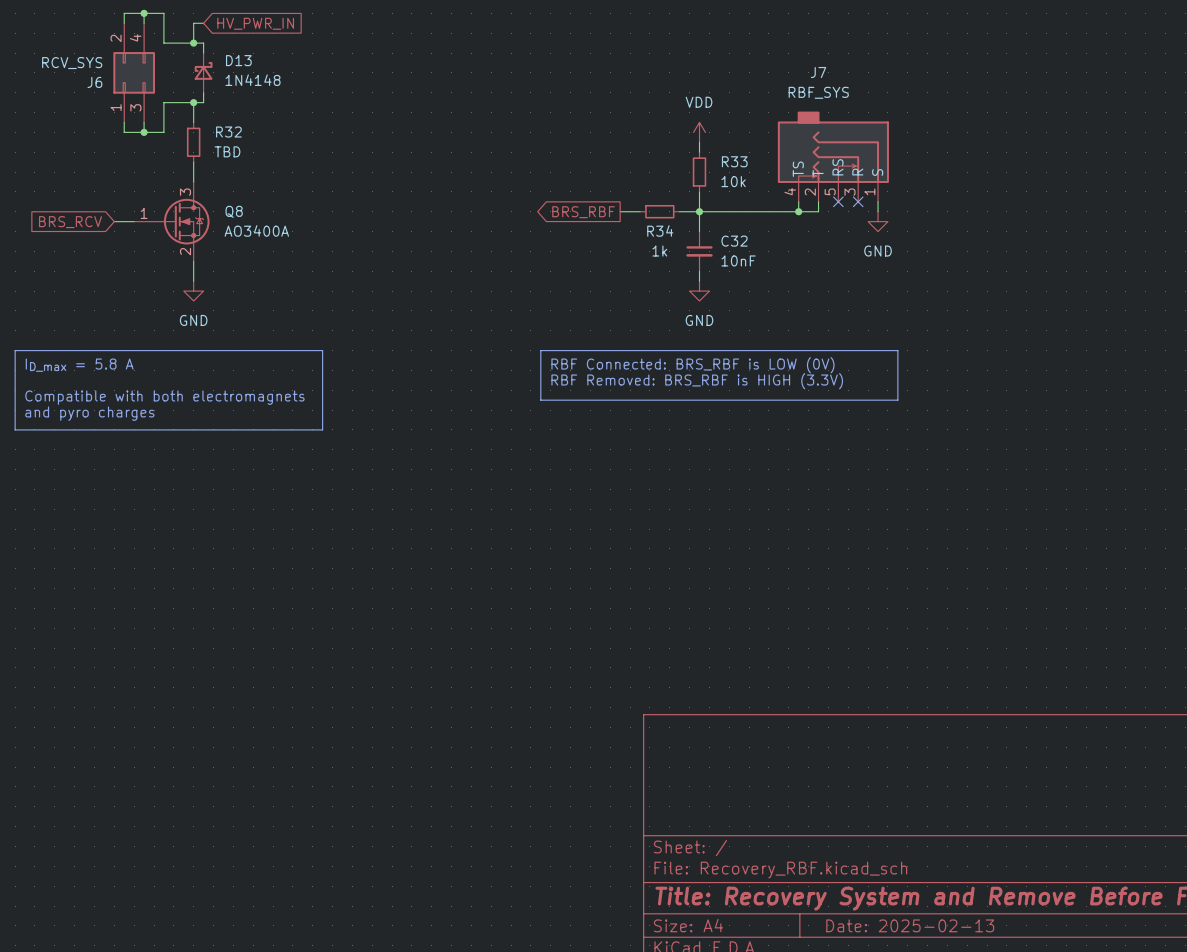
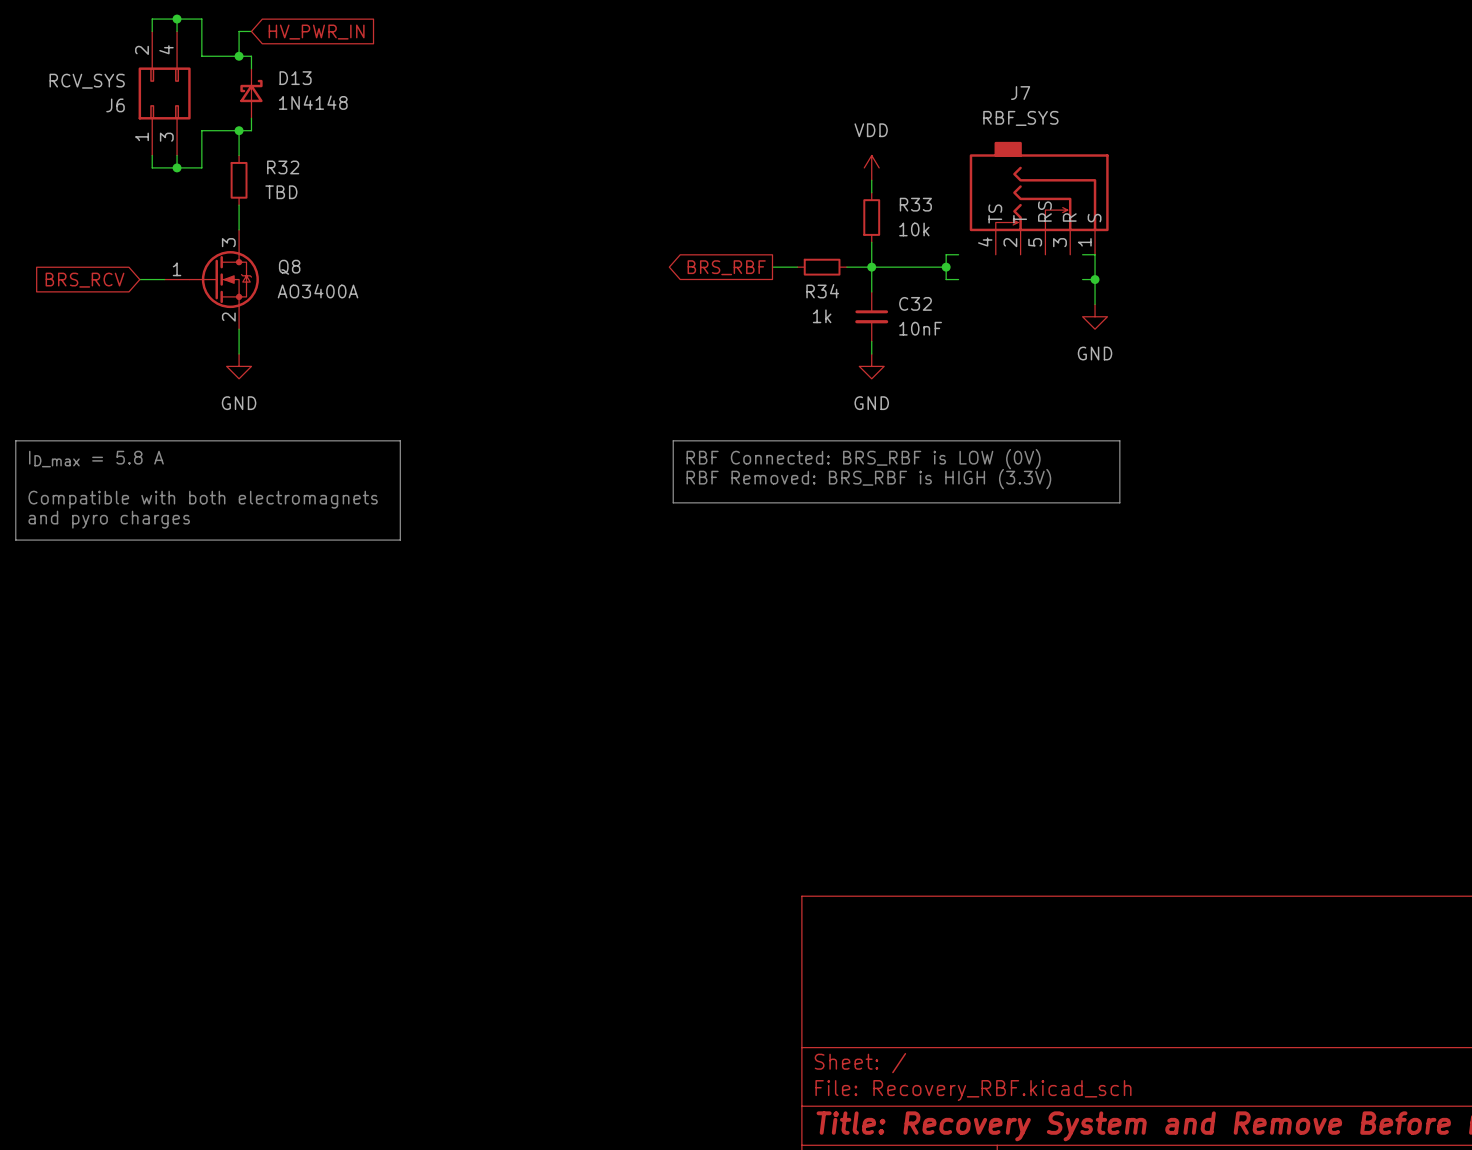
wire: none -> (958, 254) (946, 254) (946, 279) (958, 279)
wire: (798, 201) (798, 211) -> none
wire: (818, 201) (818, 211) (759, 211) -> none
no-connect mark: (838, 201) -> none
no-connect mark: (858, 201) -> none
wire: none -> (1082, 254) (1095, 254)
junction position: (798, 211) -> (946, 267)
wire: none -> (1095, 267) (1095, 304)
junction: none -> (1095, 279)
power symbol position: GND (878, 221) -> GND (1095, 316)

